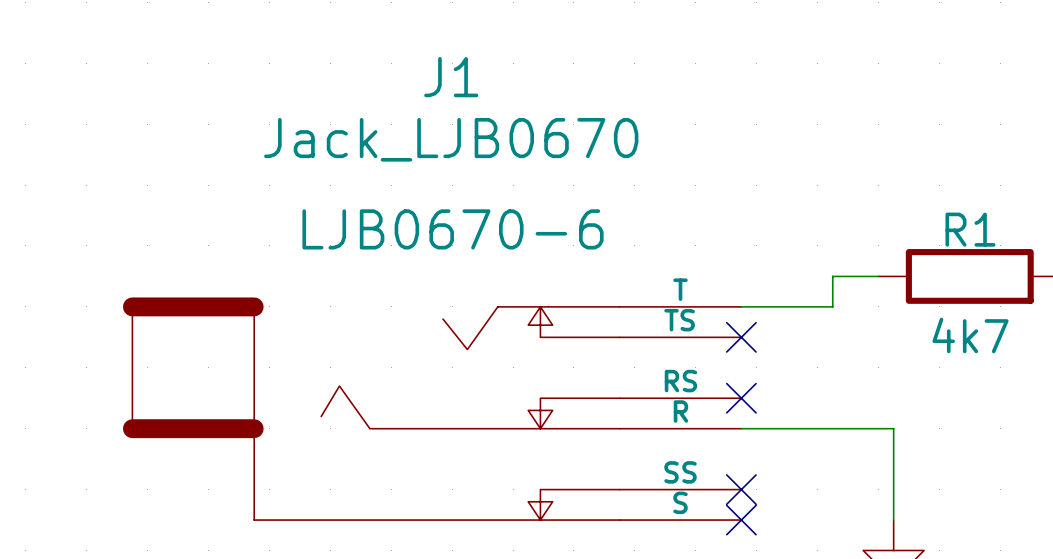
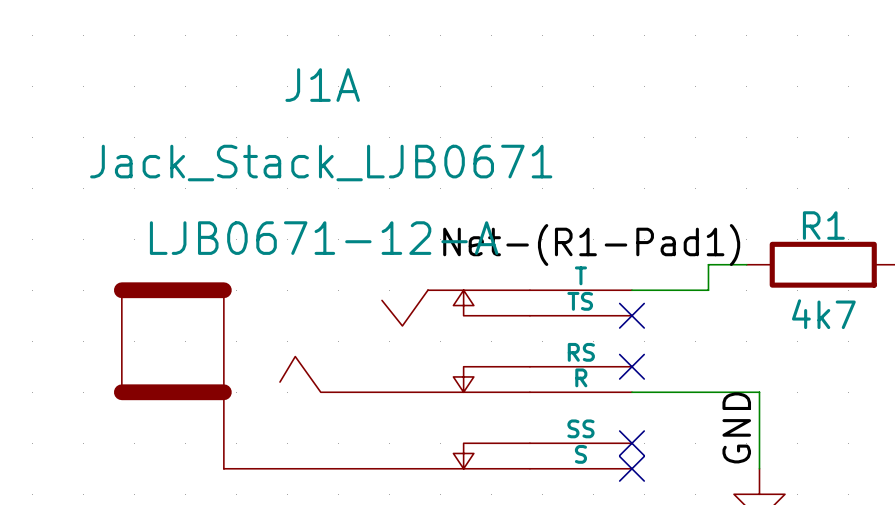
J1 name: J1 (451, 77) -> J1A (322, 85)
J1 value: Jack_LJB0670 (451, 139) -> Jack_Stack_LJB0671 (321, 163)
J1 text: LJB0670-6 (453, 229) -> LJB0671-12-A (324, 238)
label: none -> Net-(R1-Pad1) (591, 245)
label: none -> GND (736, 427)

